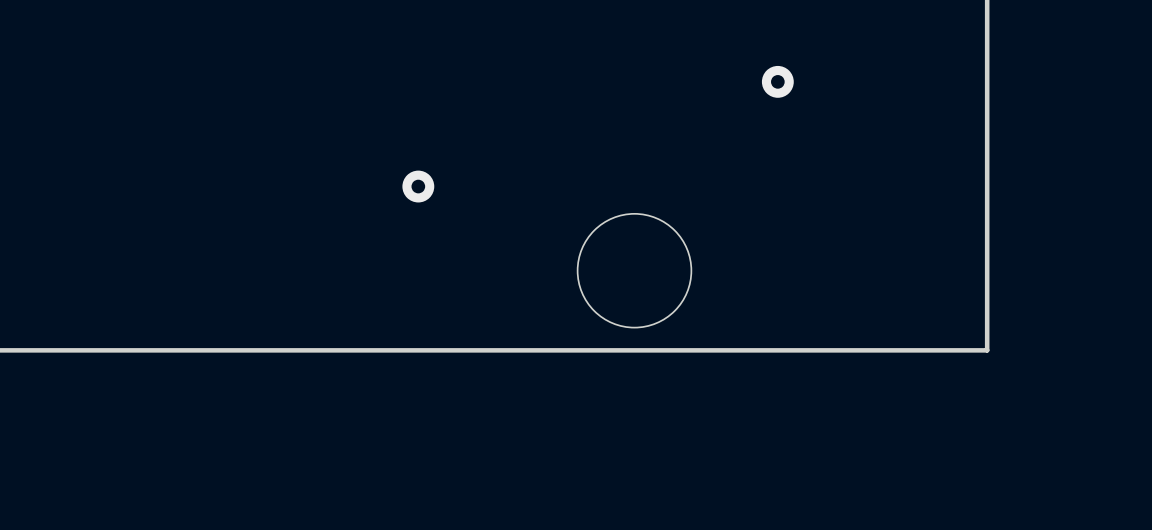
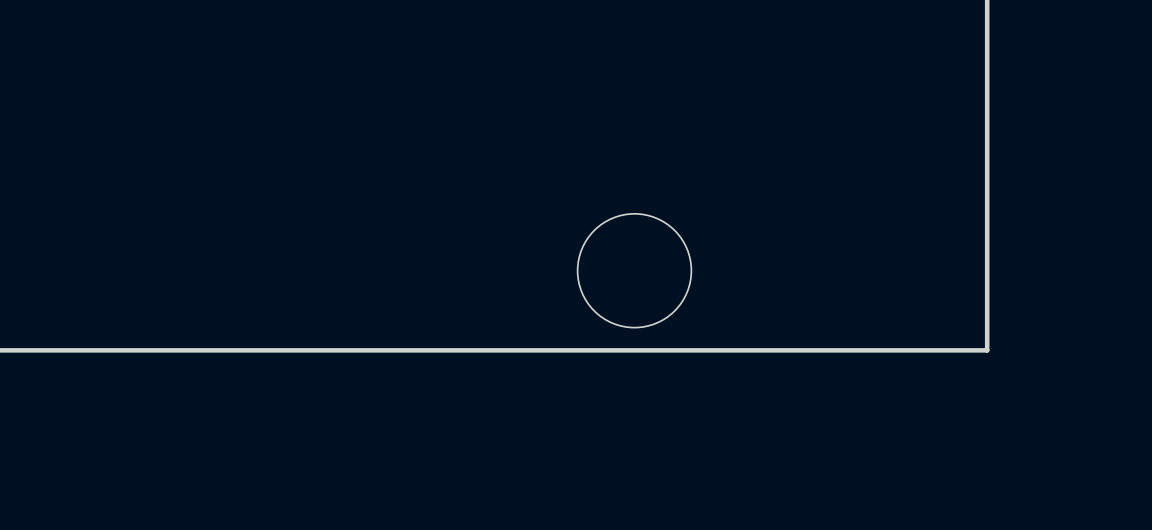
via: (777, 81) -> none
via: (418, 186) -> none

